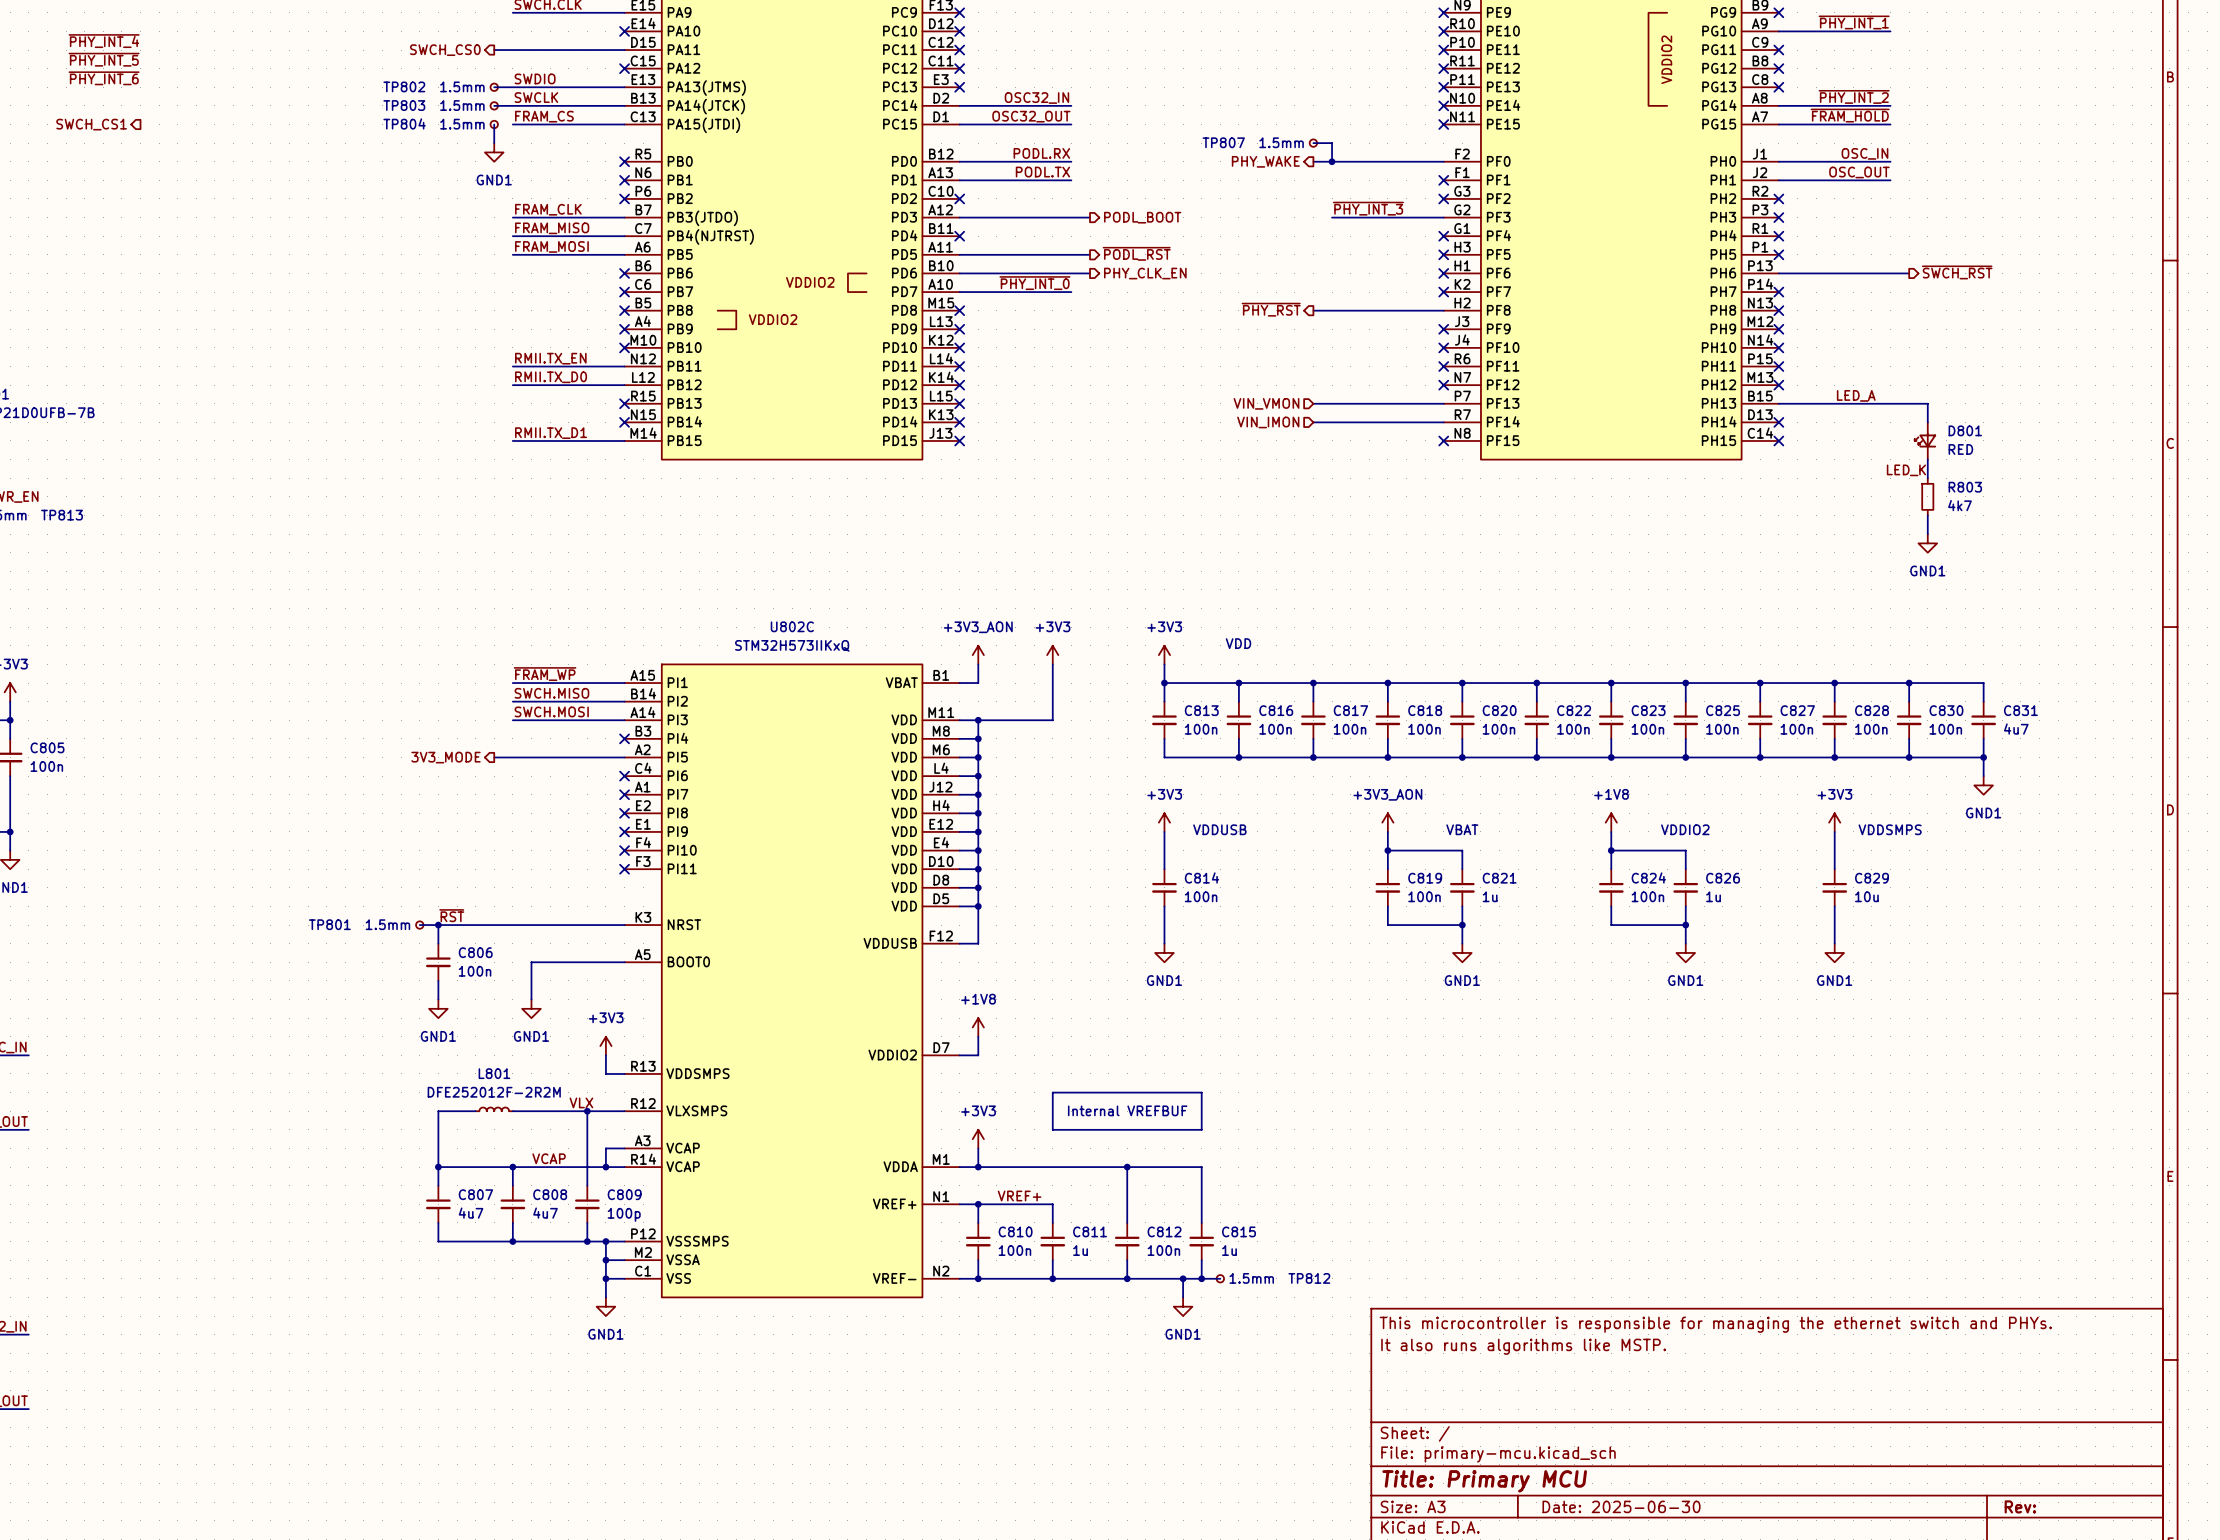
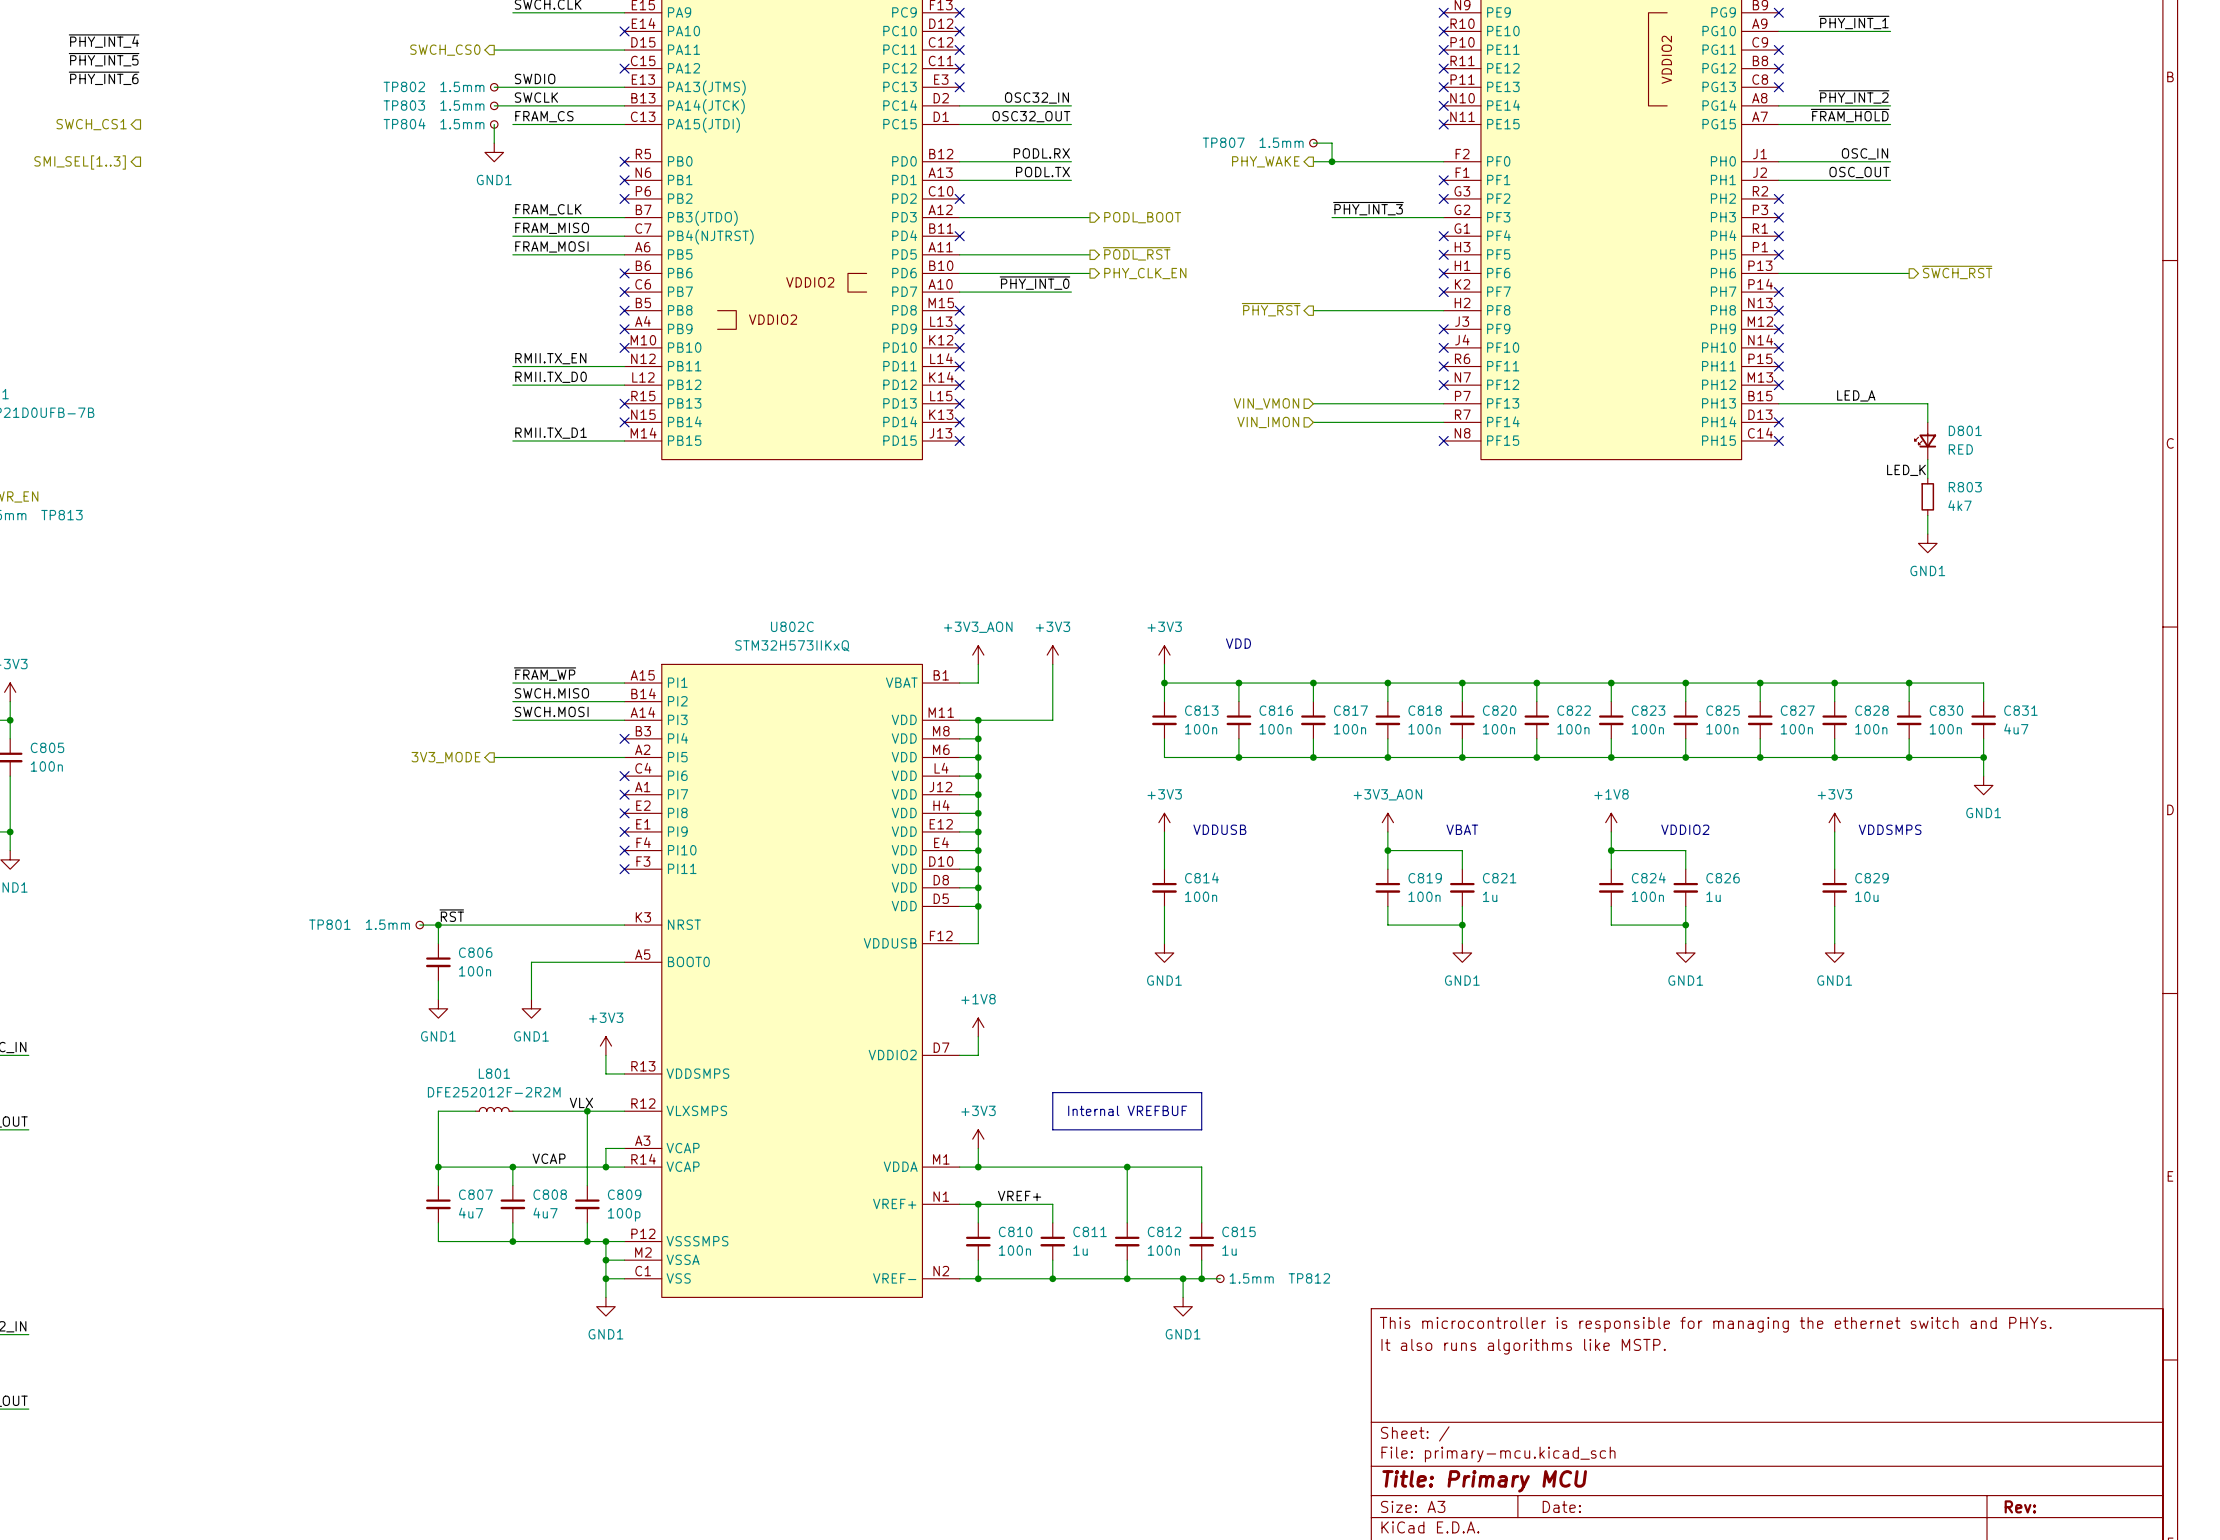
hierarchical label: none -> SMI_SEL[1..3] (80, 162)
title block: Date: 2025-06-30 (1621, 1506) -> Date: (1561, 1506)

